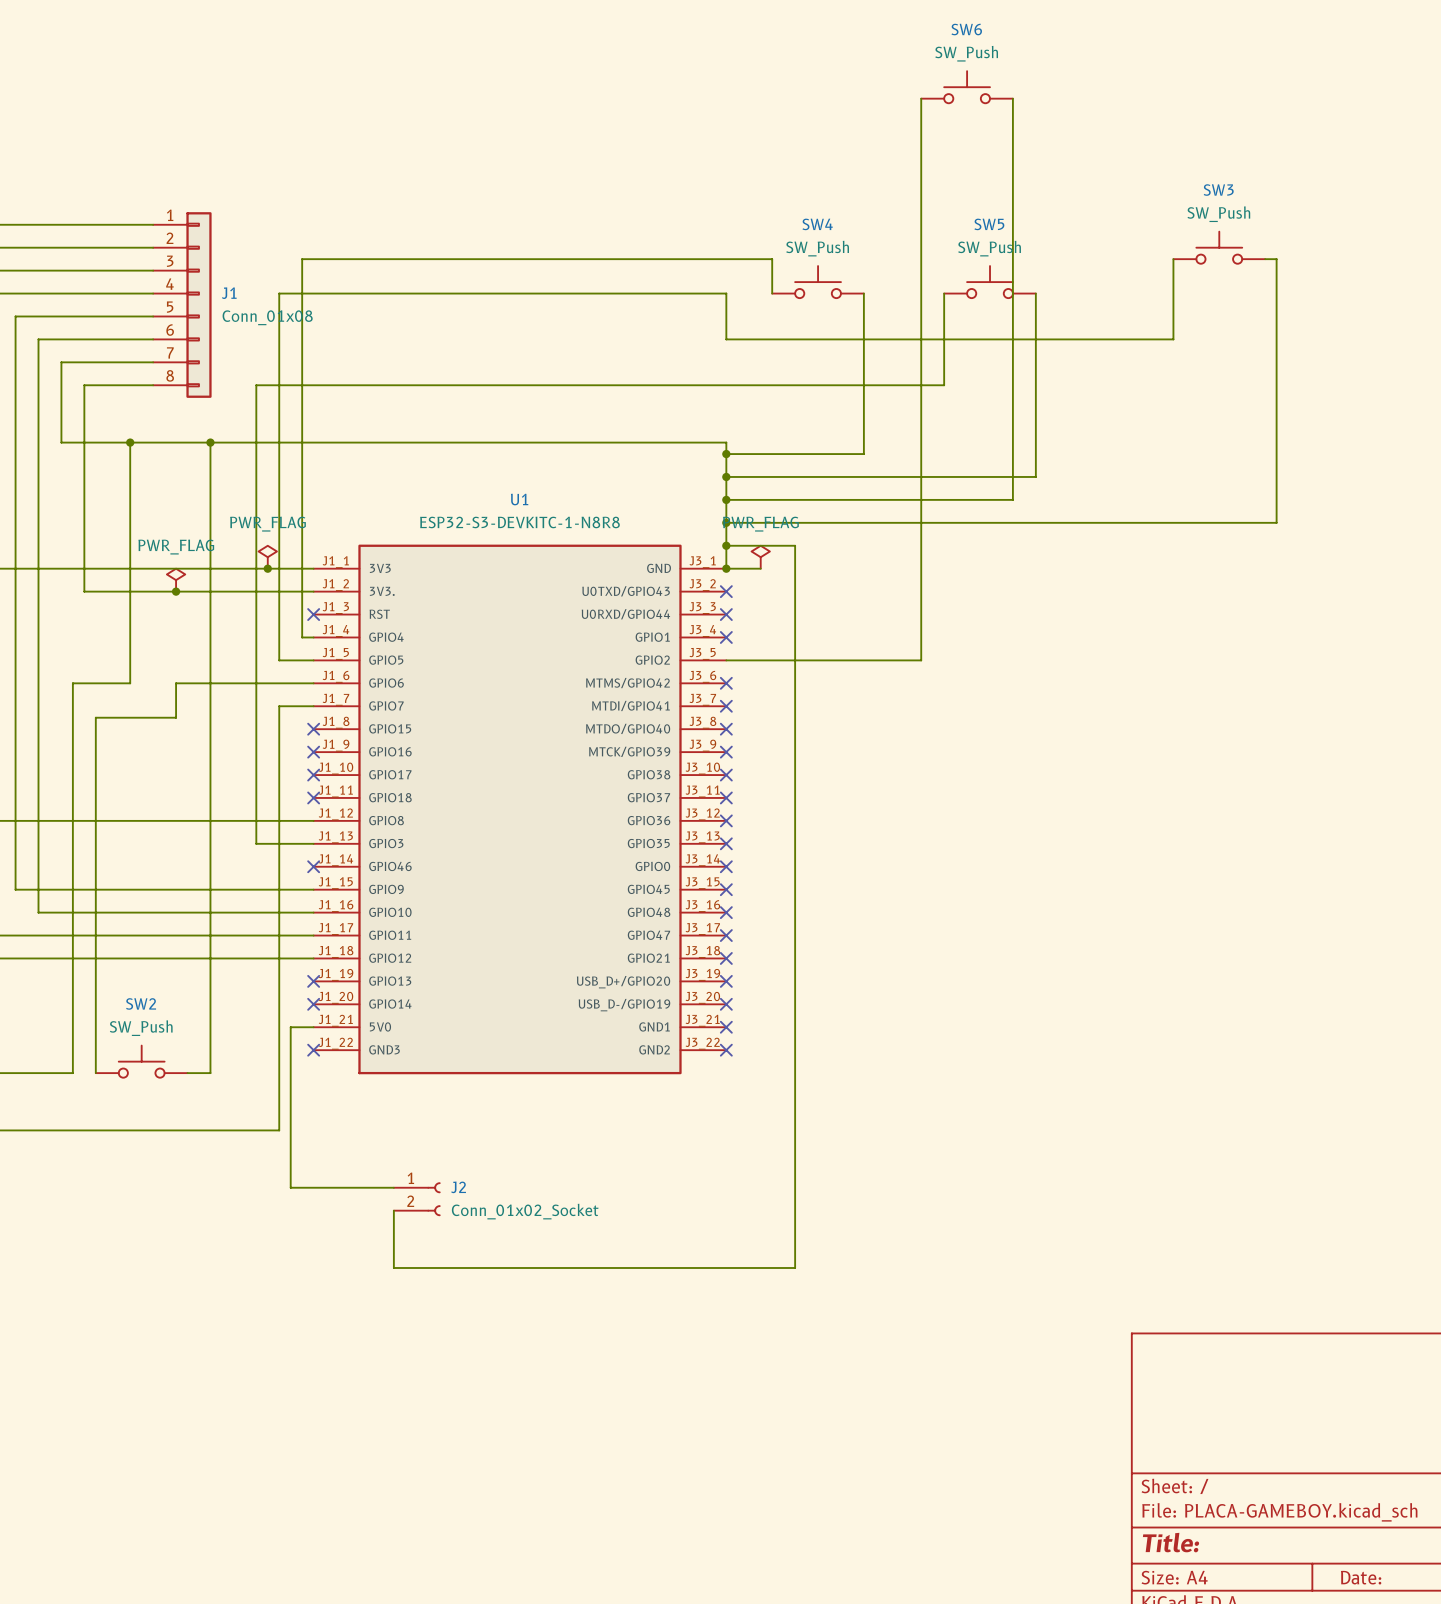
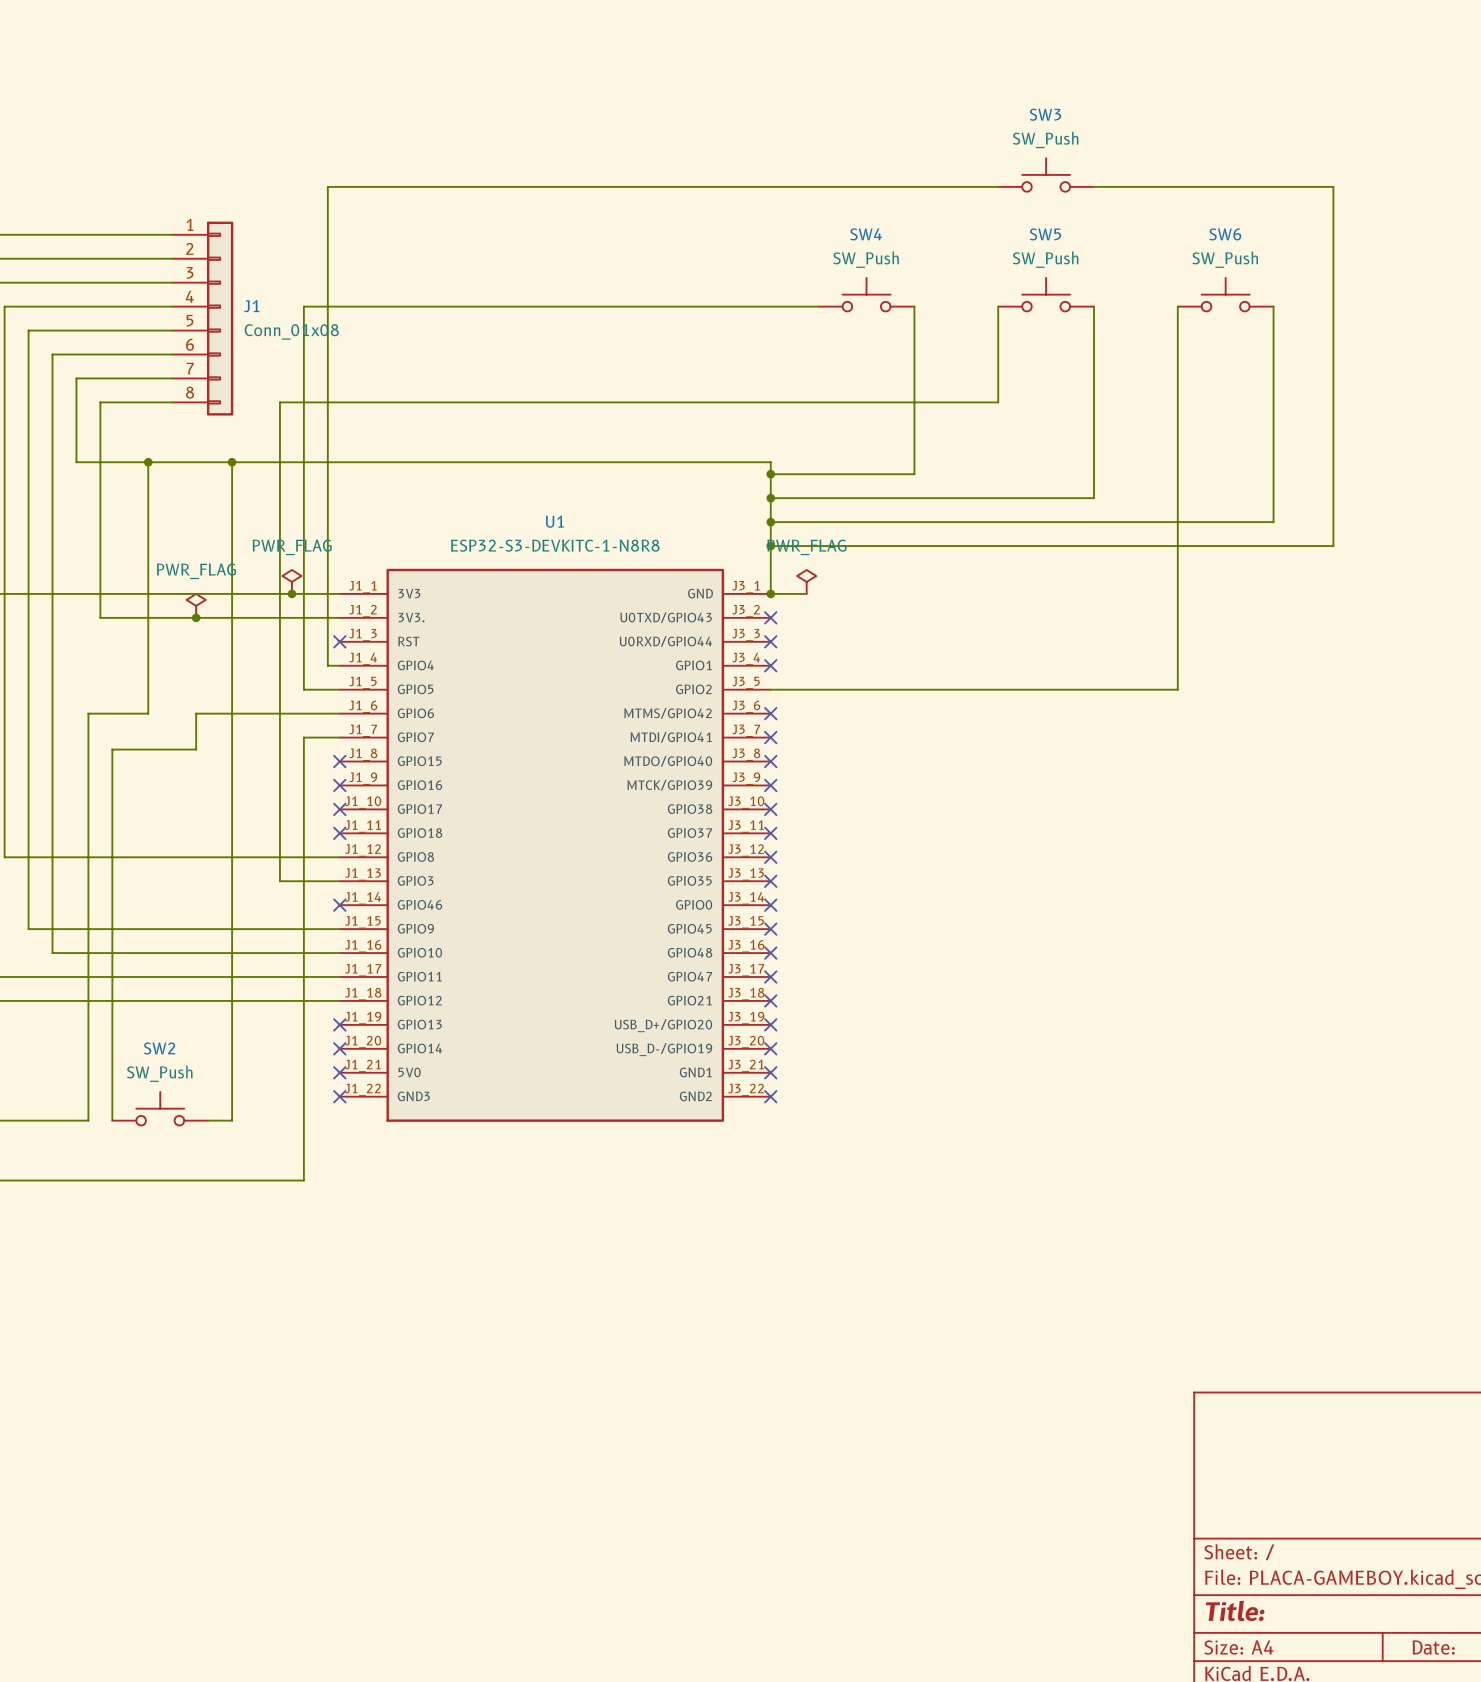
SW6 position: (967, 87) -> (1225, 294)
wire: (921, 98) (921, 660) -> (1177, 306) (1177, 689) (974, 689)
wire: (1012, 98) (1012, 499) -> (1273, 306) (1273, 522) (1070, 522)
SW3 position: (1219, 247) -> (1046, 174)
wire: (302, 259) (772, 259) (772, 293) -> (327, 270) (327, 186) (998, 186)
wire: (1173, 259) (1173, 339) (726, 339) (726, 293) -> (818, 306) (770, 306)
wire: (1265, 259) (1276, 259) (1276, 522) (1265, 522) -> (1093, 186) (1333, 186) (1333, 546)
wire: (726, 545) (795, 545) (795, 1267) (393, 1267) (393, 1210) -> none
junction: (726, 545) -> none
wire: (313, 1027) (290, 1027) (290, 1187) (393, 1187) -> none
no-connect mark: none -> (339, 1072)
J2: Conn_01x02_Socket (417, 1199) -> none

